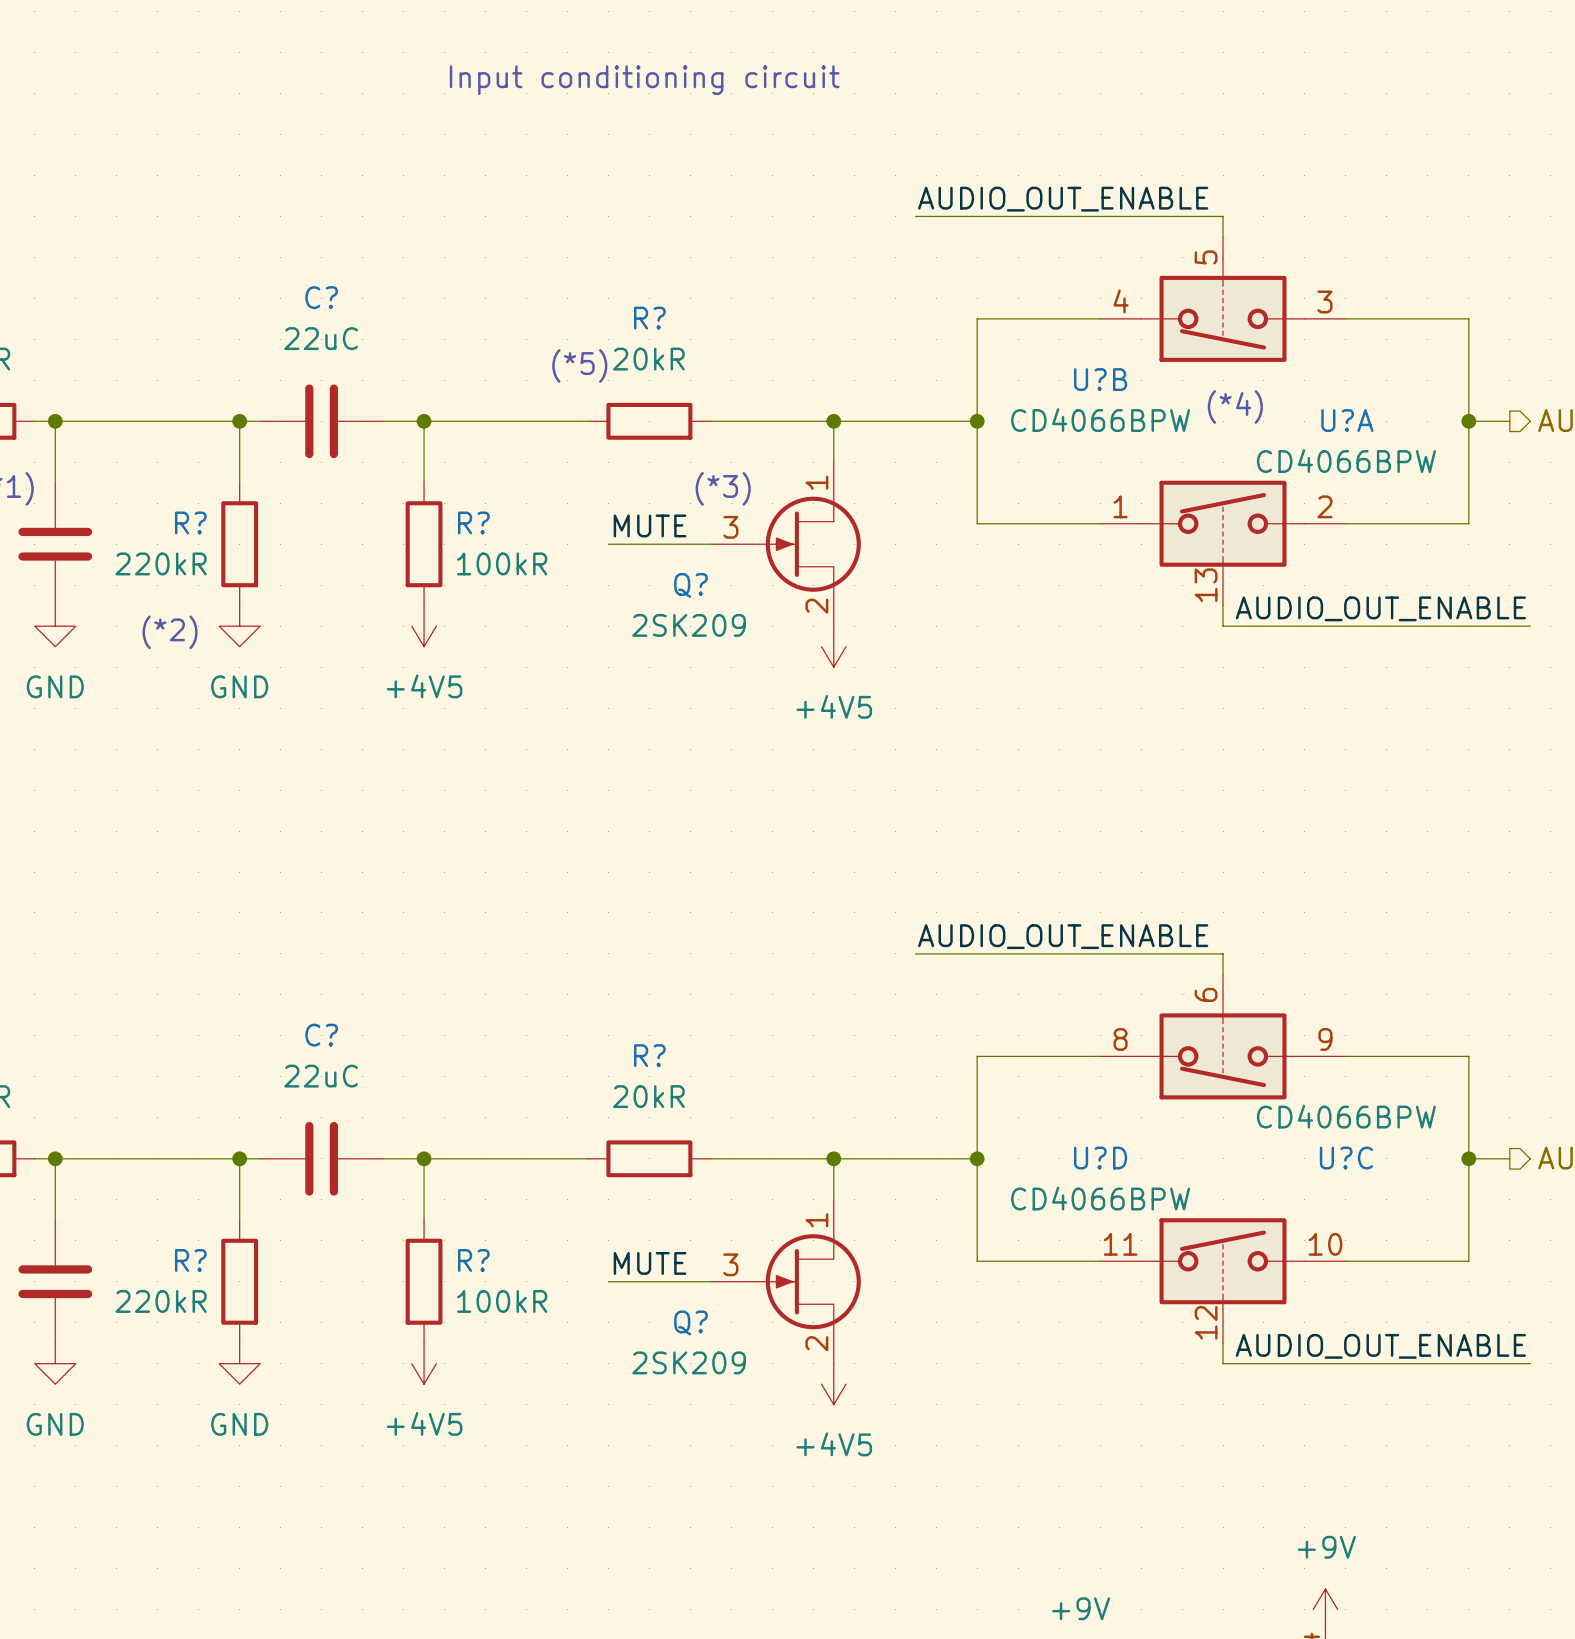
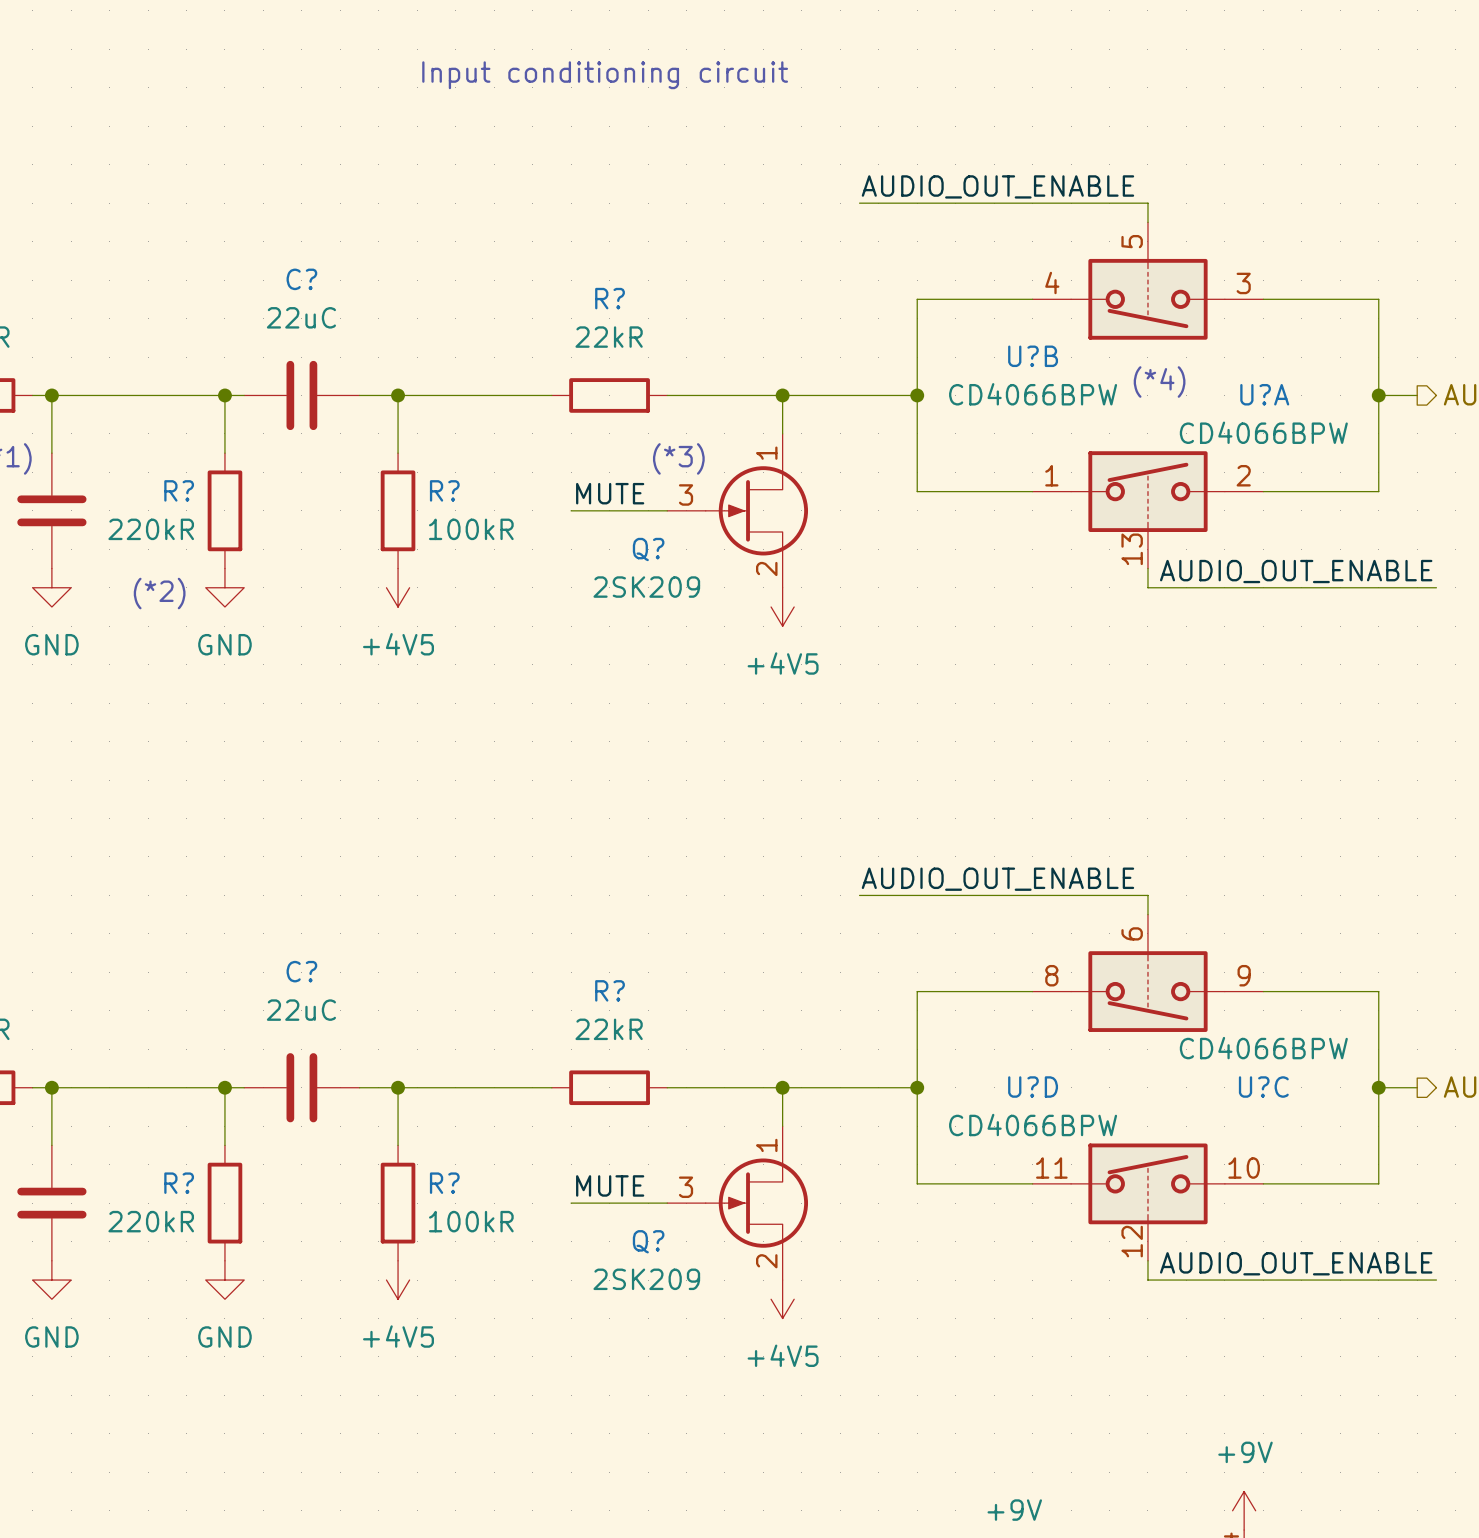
R? value: 20kR (648, 359) -> 22kR (609, 337)
text: (*5) (579, 365) -> none
R? value: 20kR (648, 1096) -> 22kR (609, 1029)

